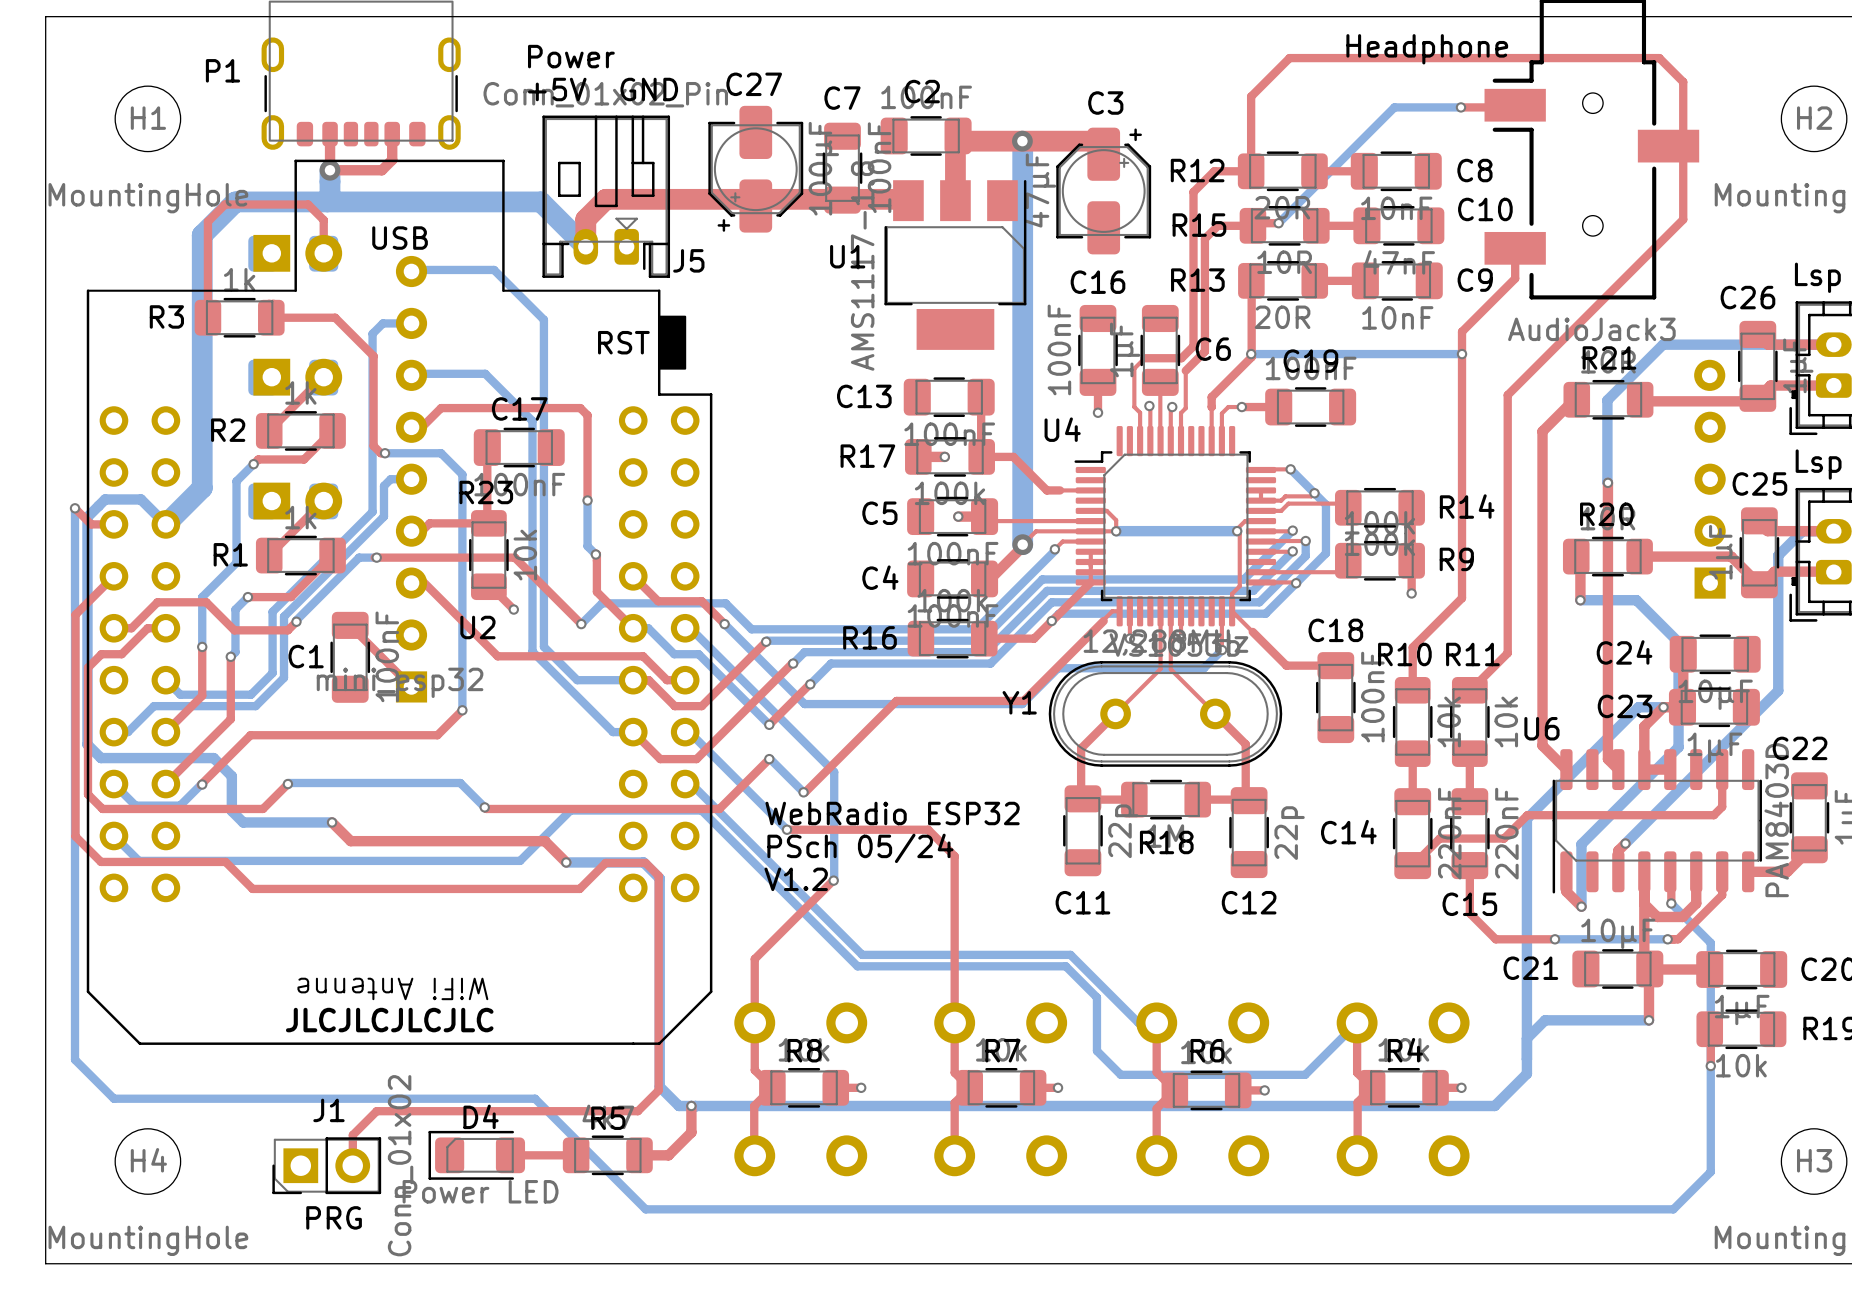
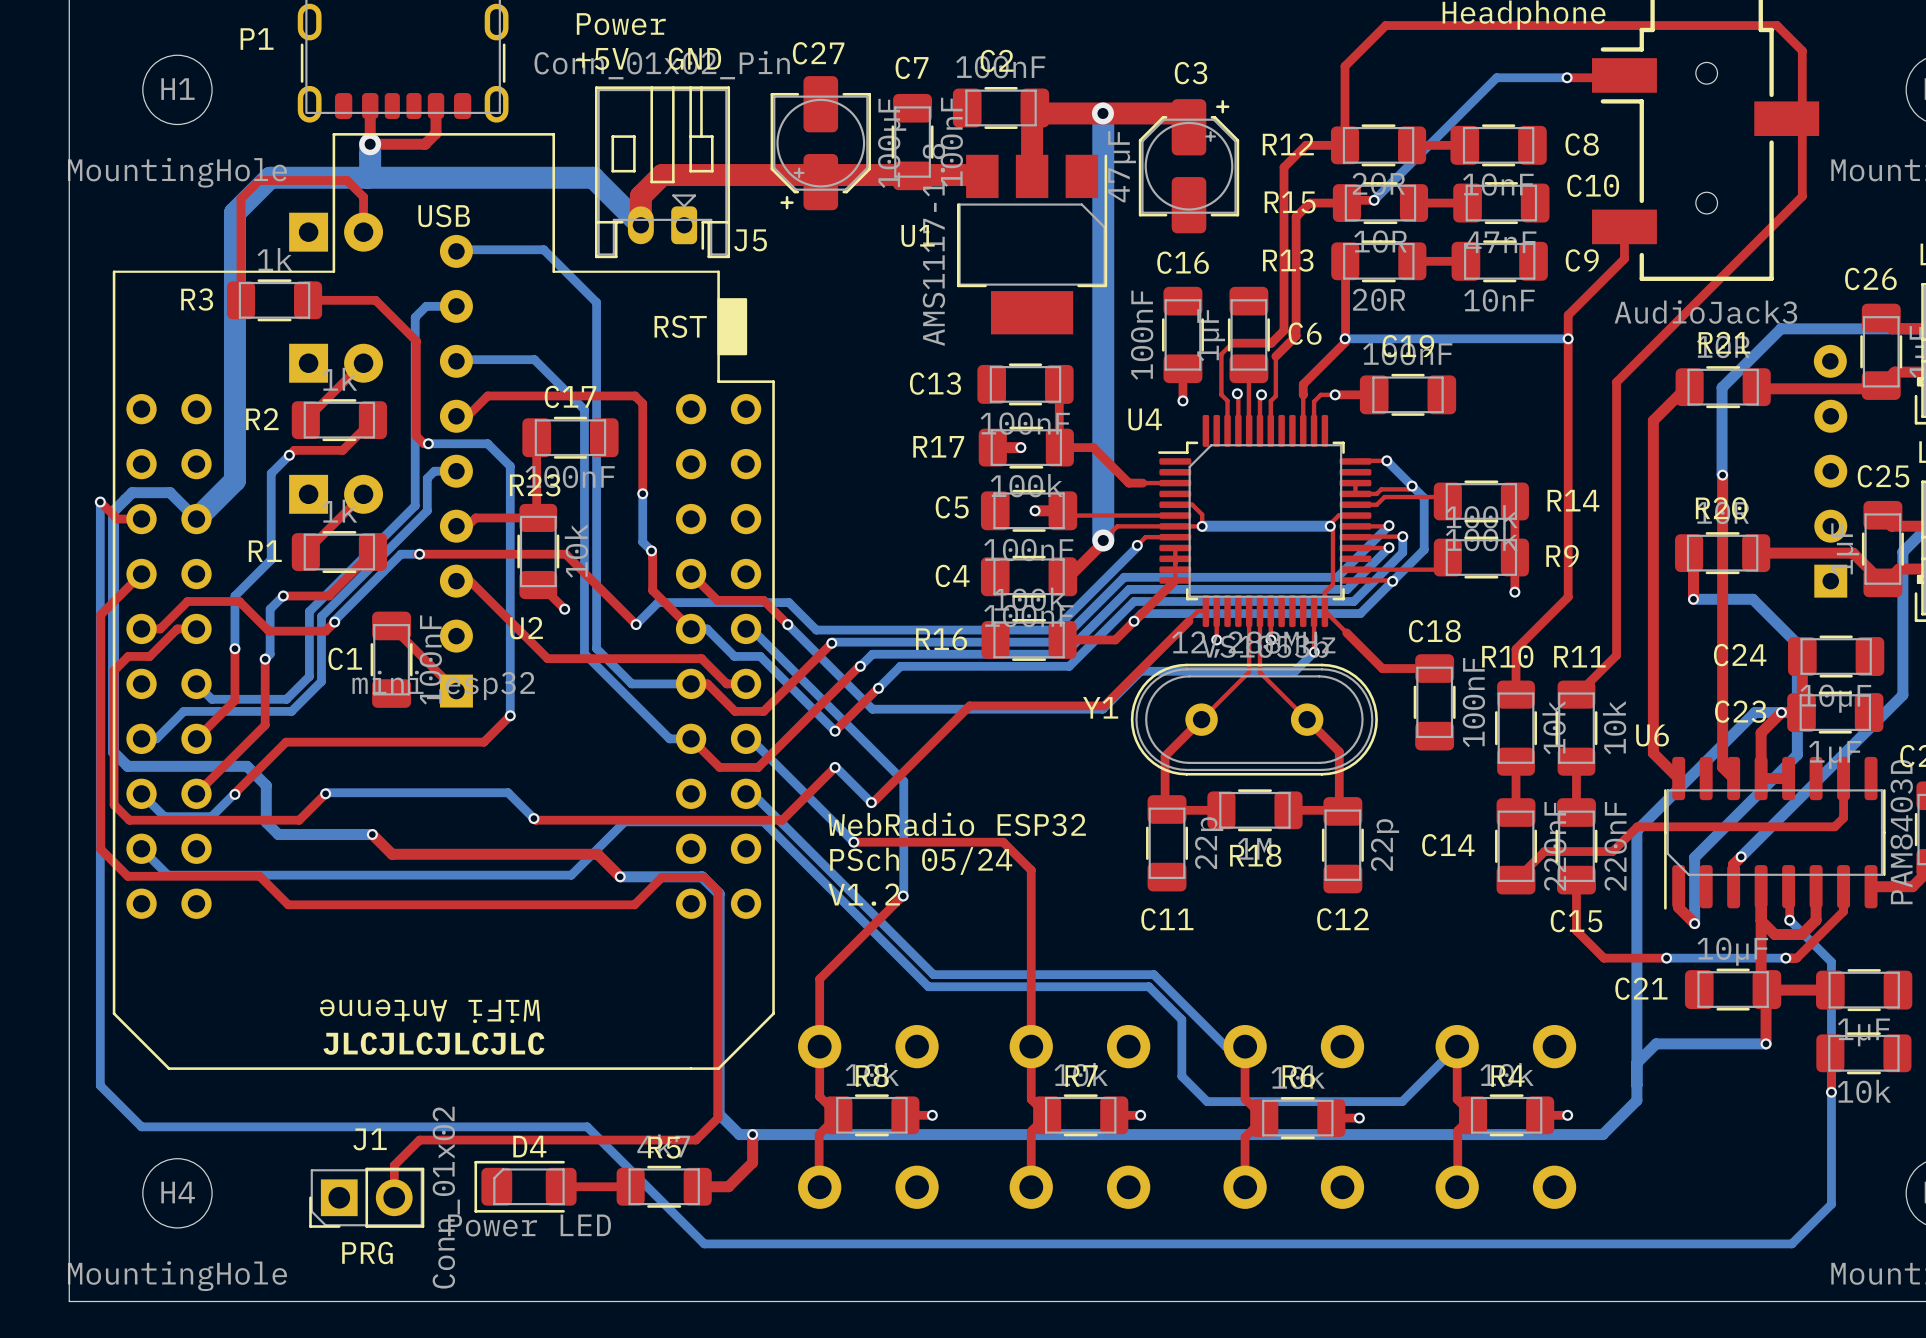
part footprint: [248, 234, 343, 272] -> [289, 212, 384, 252]
part footprint: [248, 358, 343, 396] -> [289, 343, 384, 383]
part footprint: [248, 482, 343, 520] -> [289, 474, 384, 514]

